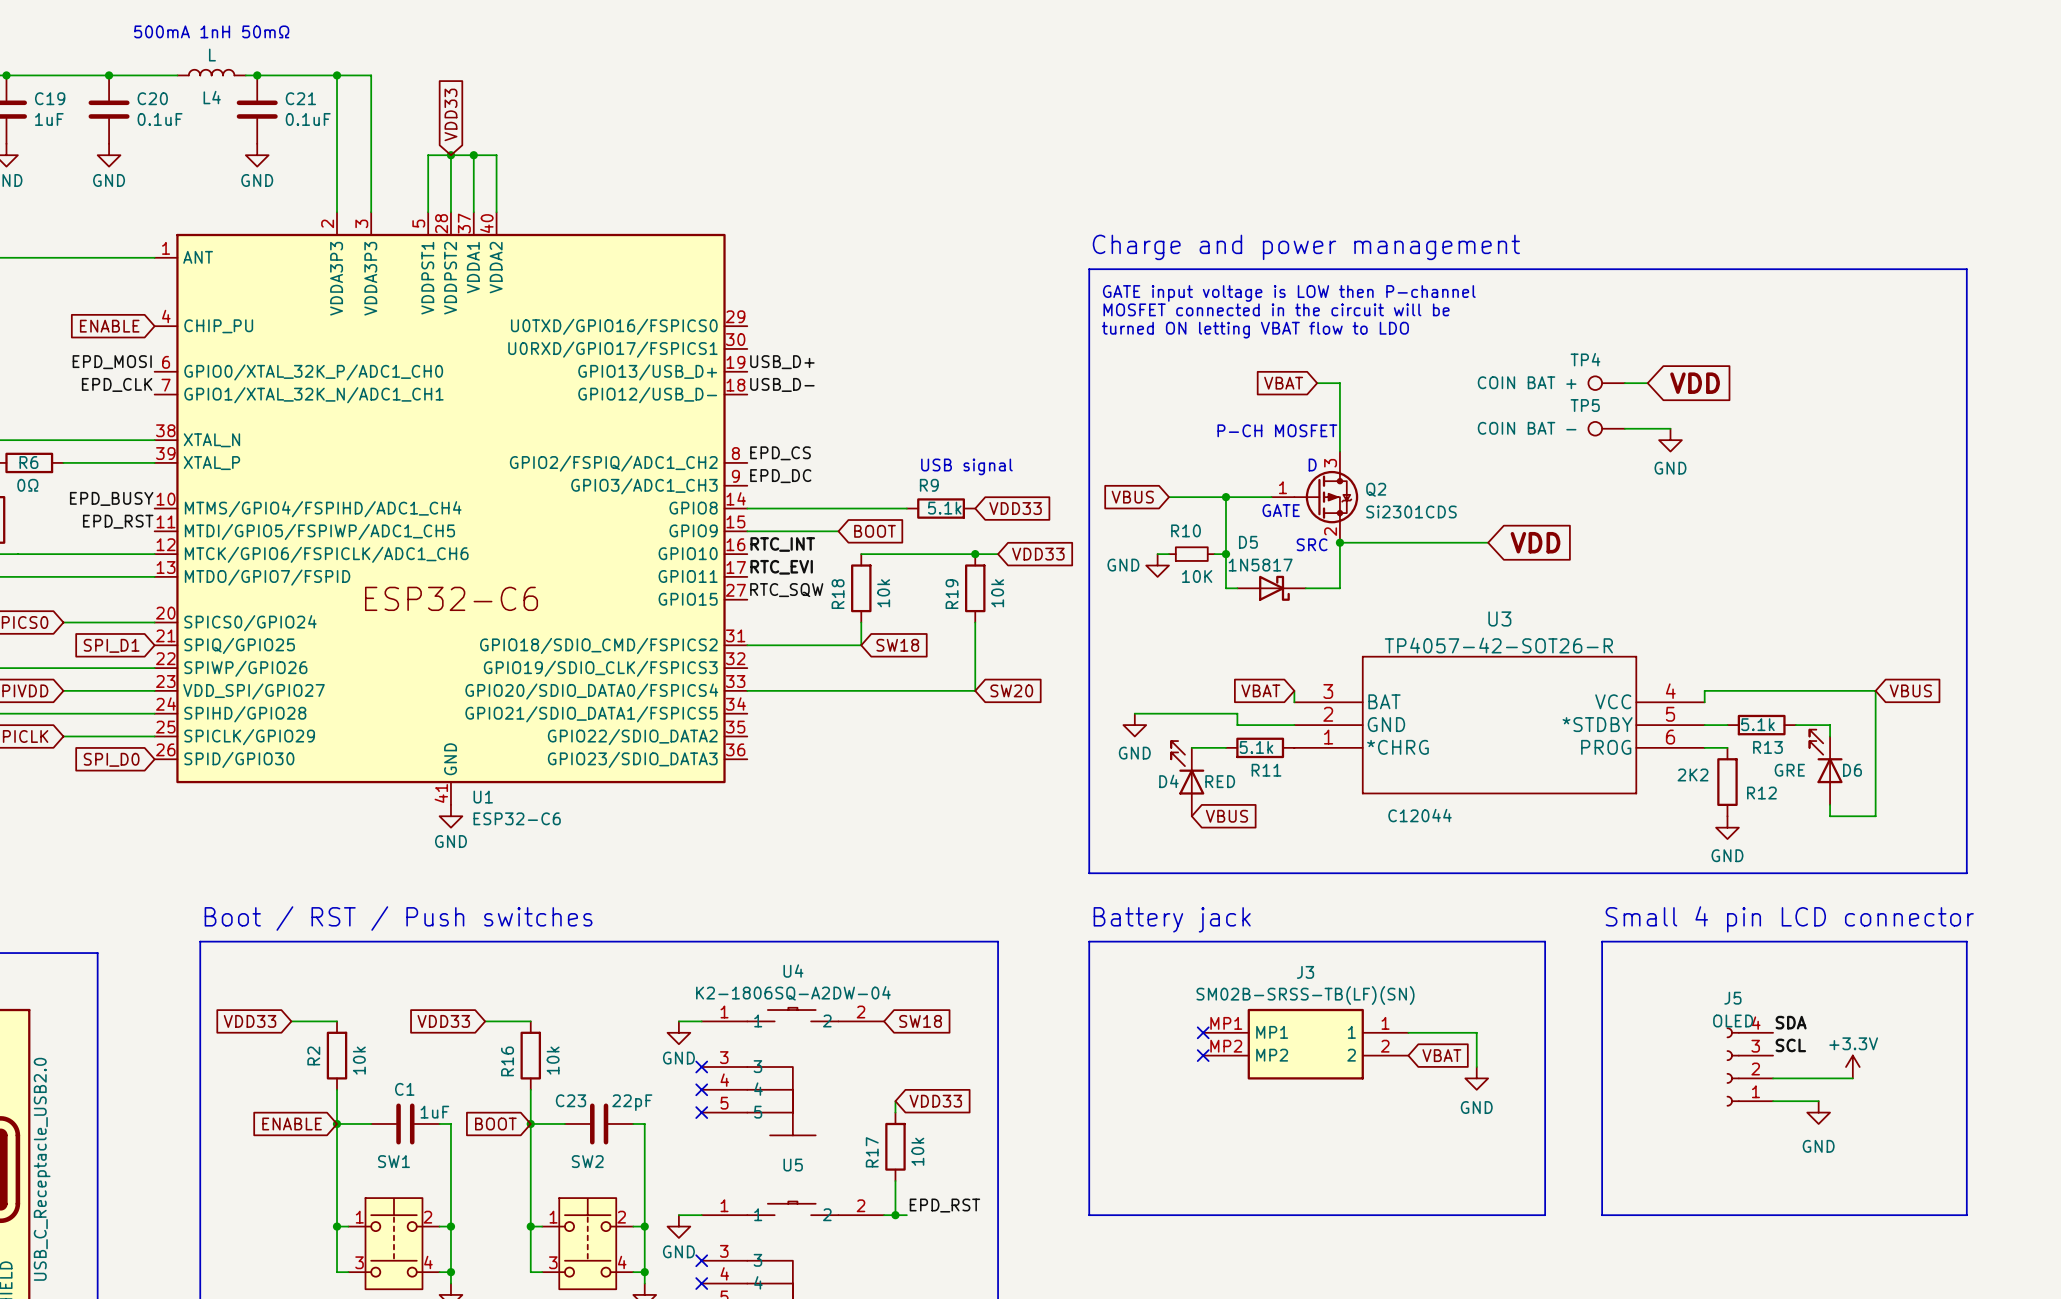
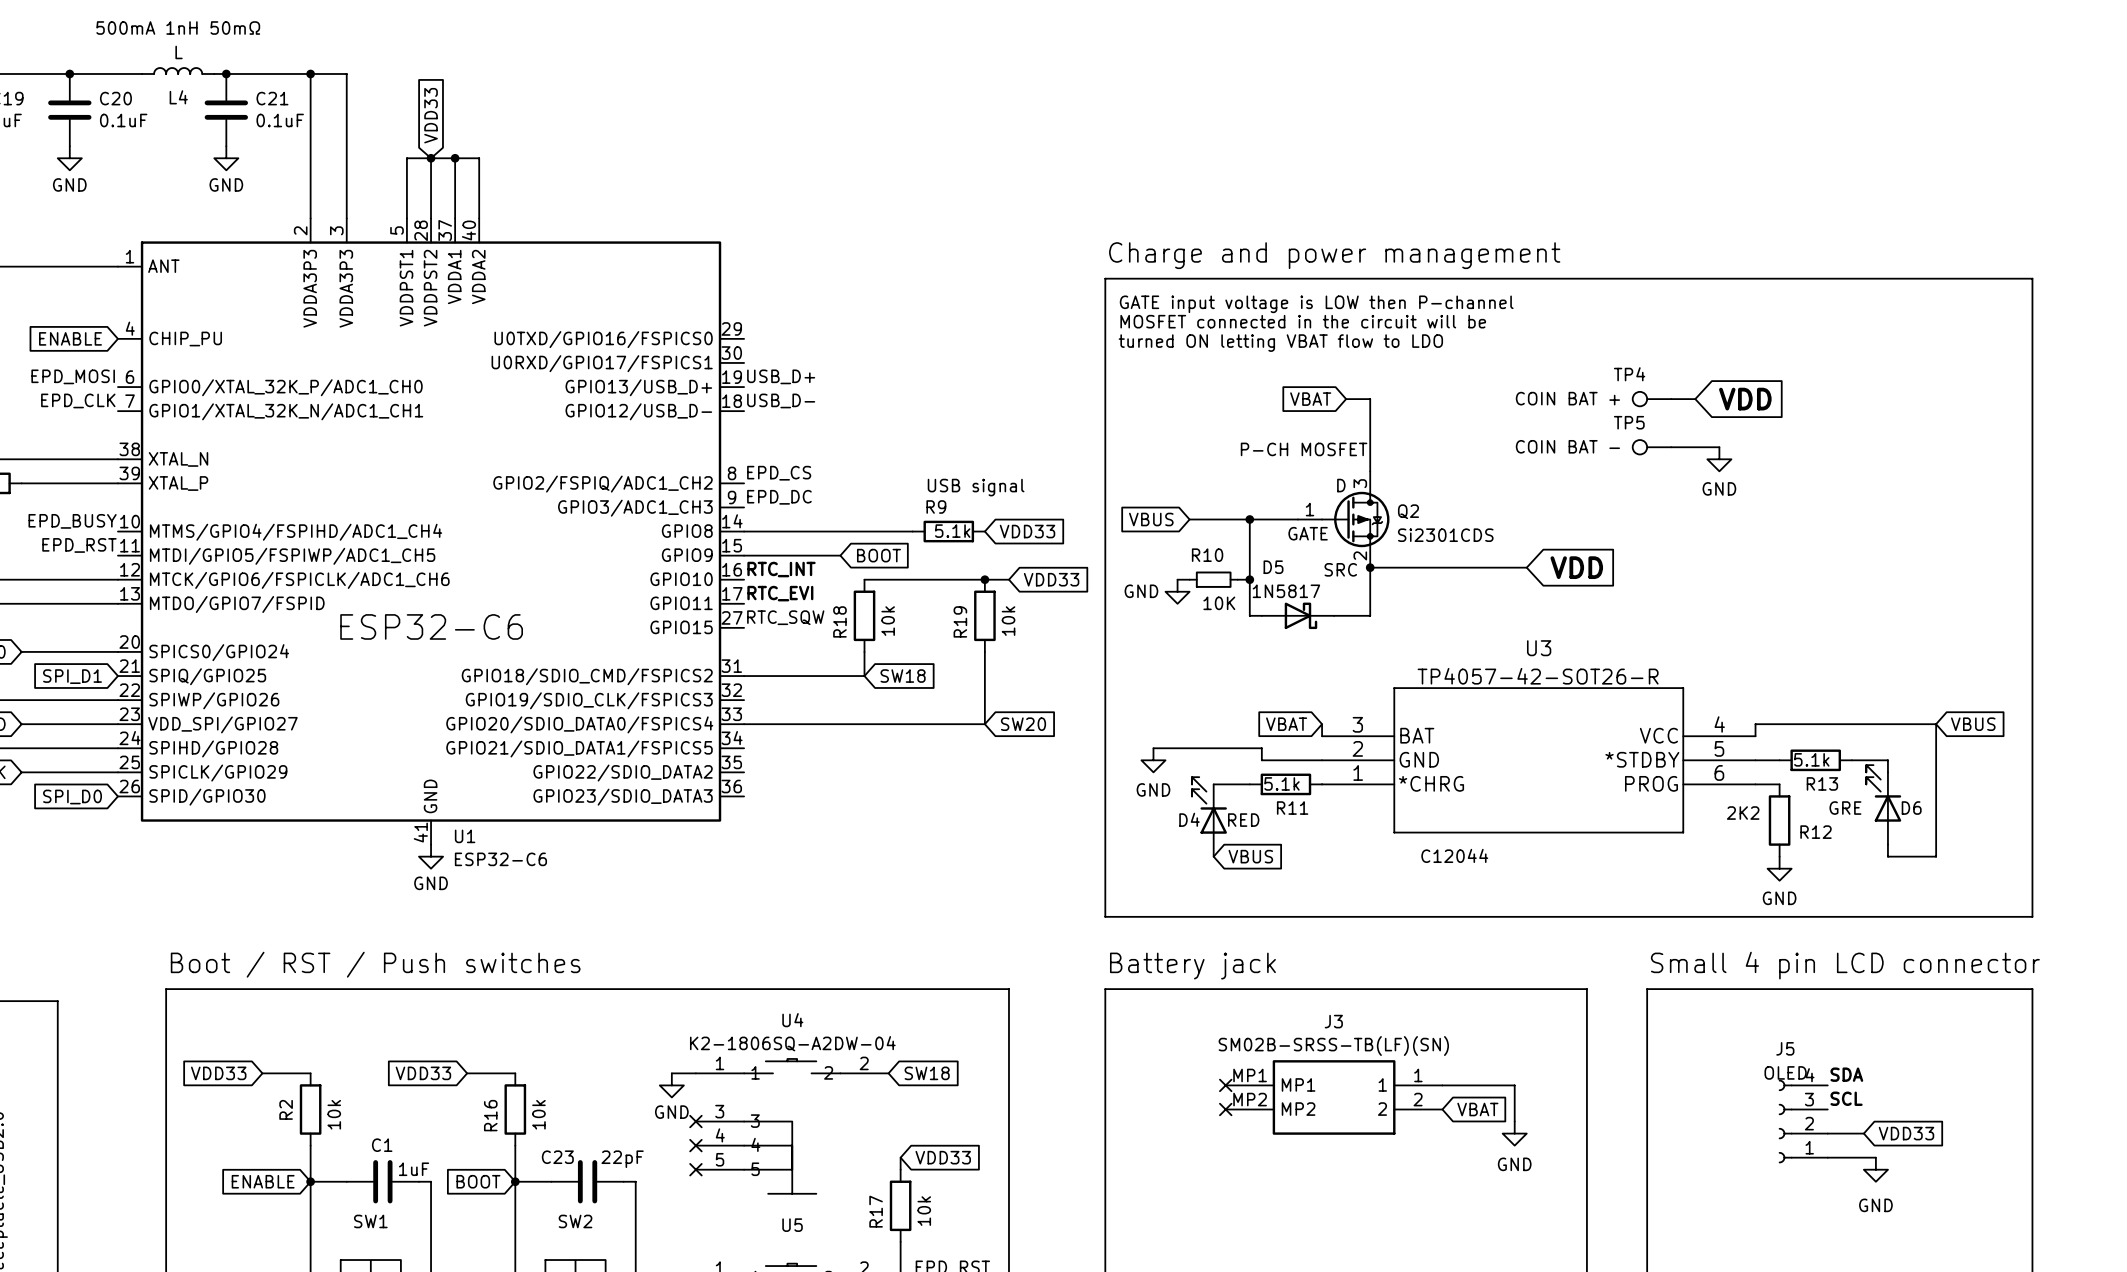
power symbol: +3.3V (1852, 1067) -> none
wire: (1807, 1078) (1852, 1078) -> none
global label: none -> VDD33 (1906, 1133)

